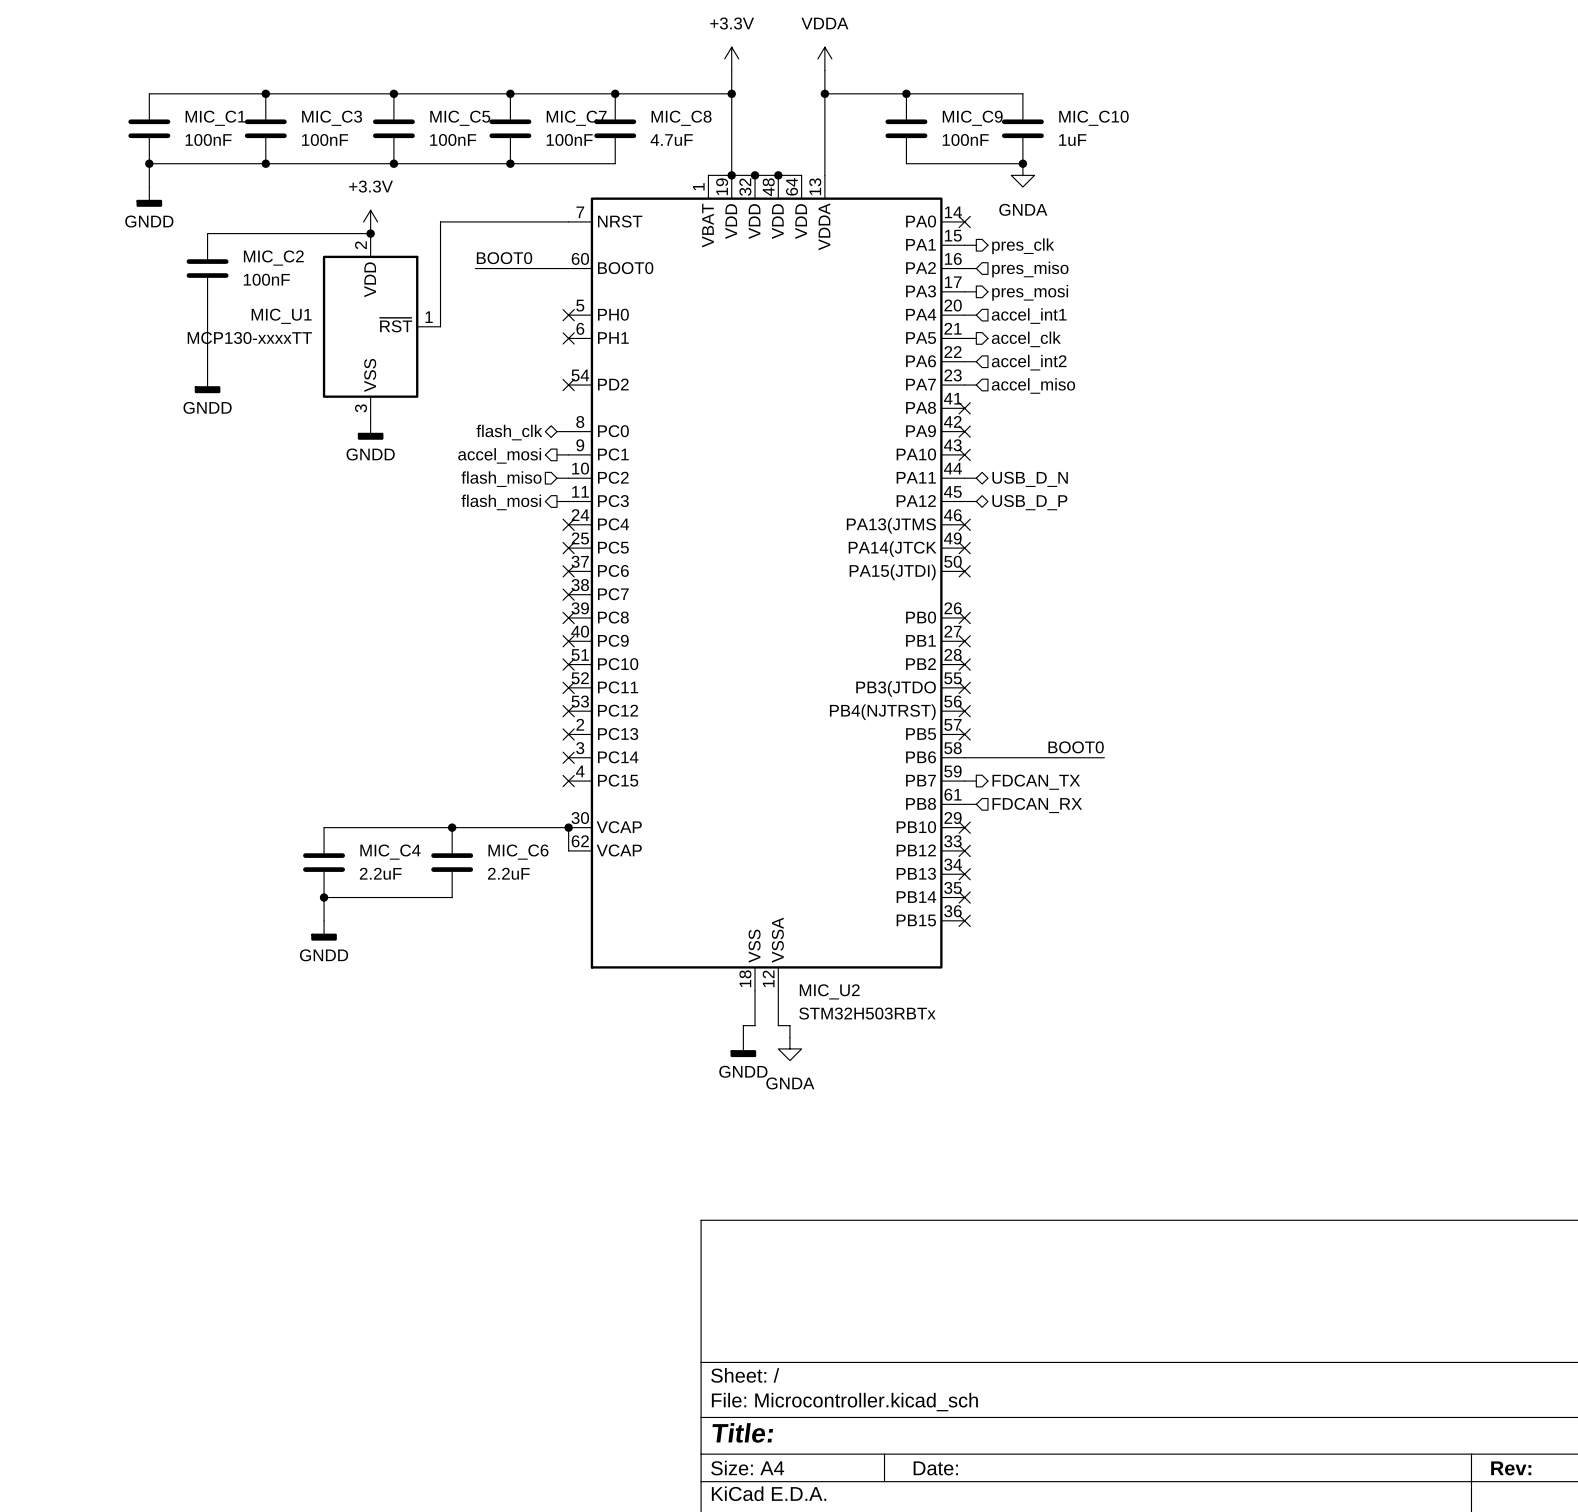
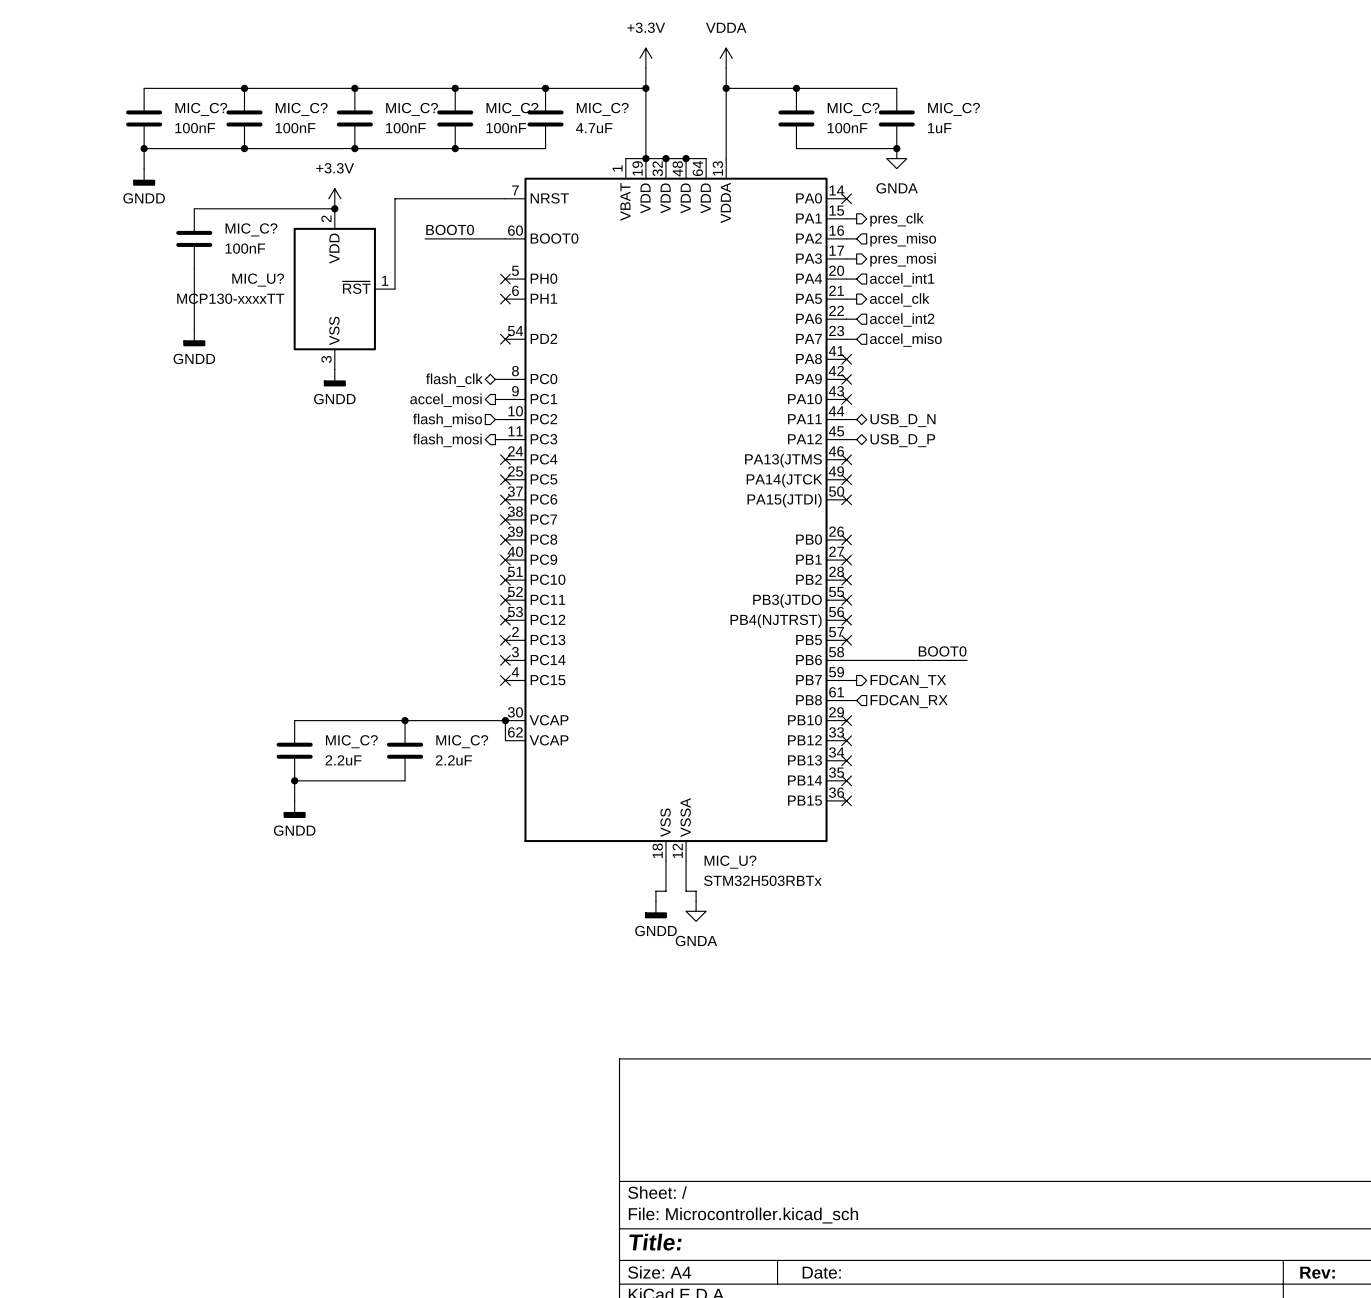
MIC_C1 name: MIC_C1 (215, 118) -> MIC_C? (201, 109)
MIC_C3 name: MIC_C3 (332, 118) -> MIC_C? (301, 109)
MIC_C5 name: MIC_C5 (460, 118) -> MIC_C? (412, 109)
MIC_C7 name: MIC_C7 (576, 118) -> MIC_C? (512, 109)
MIC_C8 name: MIC_C8 (681, 118) -> MIC_C? (602, 109)
MIC_C9 name: MIC_C9 (972, 118) -> MIC_C? (853, 109)
MIC_C10 name: MIC_C10 (1093, 118) -> MIC_C? (953, 109)
MIC_C2 name: MIC_C2 (273, 258) -> MIC_C? (251, 229)
MIC_U1 name: MIC_U1 (281, 316) -> MIC_U? (258, 280)
MIC_C4 name: MIC_C4 (390, 852) -> MIC_C? (351, 741)
MIC_C6 name: MIC_C6 (518, 852) -> MIC_C? (462, 741)
MIC_U2 name: MIC_U2 (829, 991) -> MIC_U? (730, 862)

